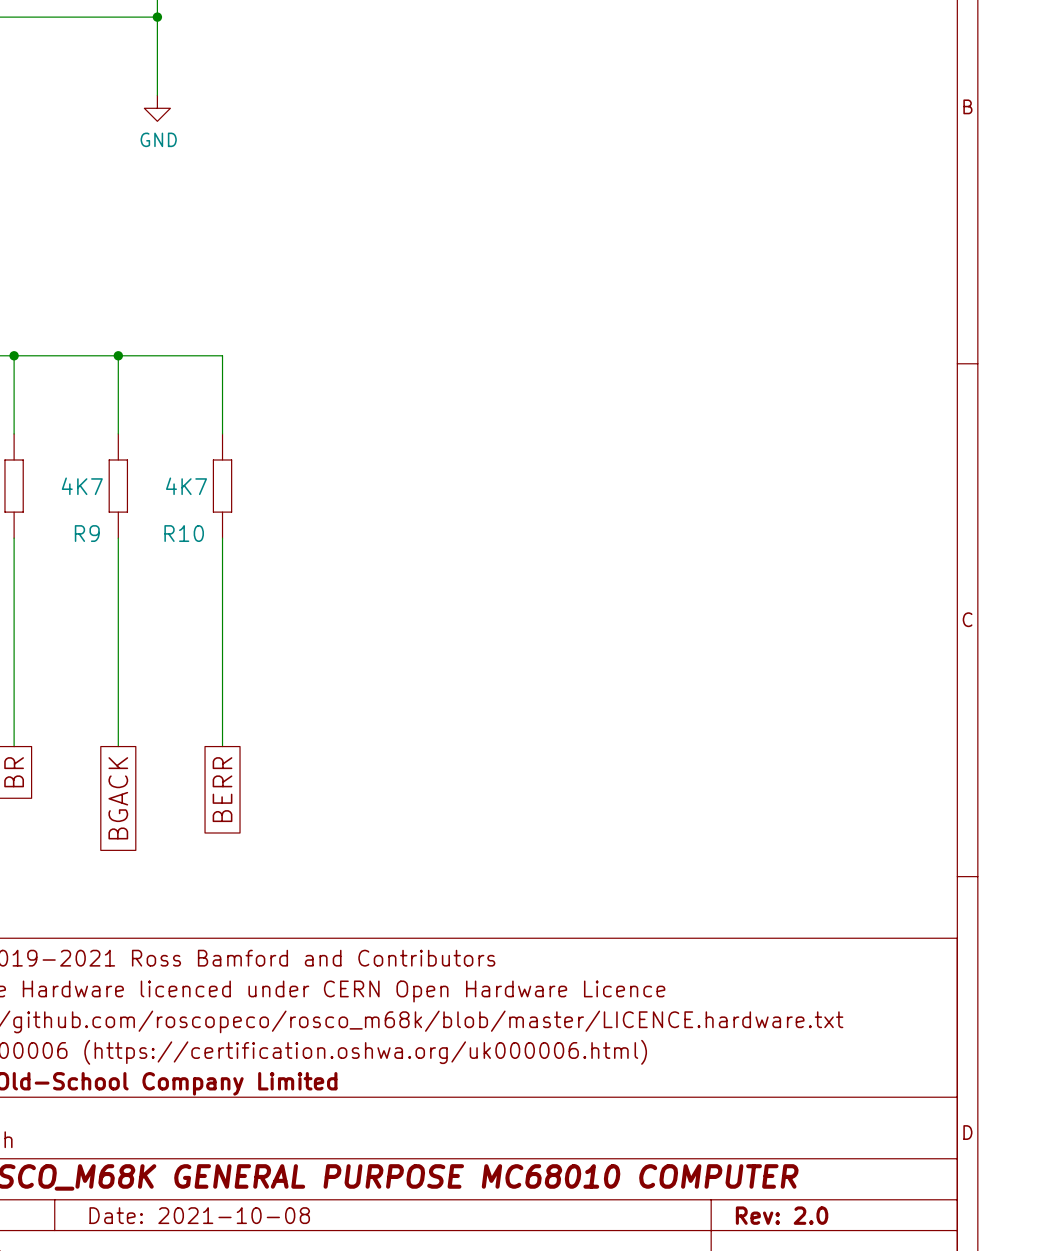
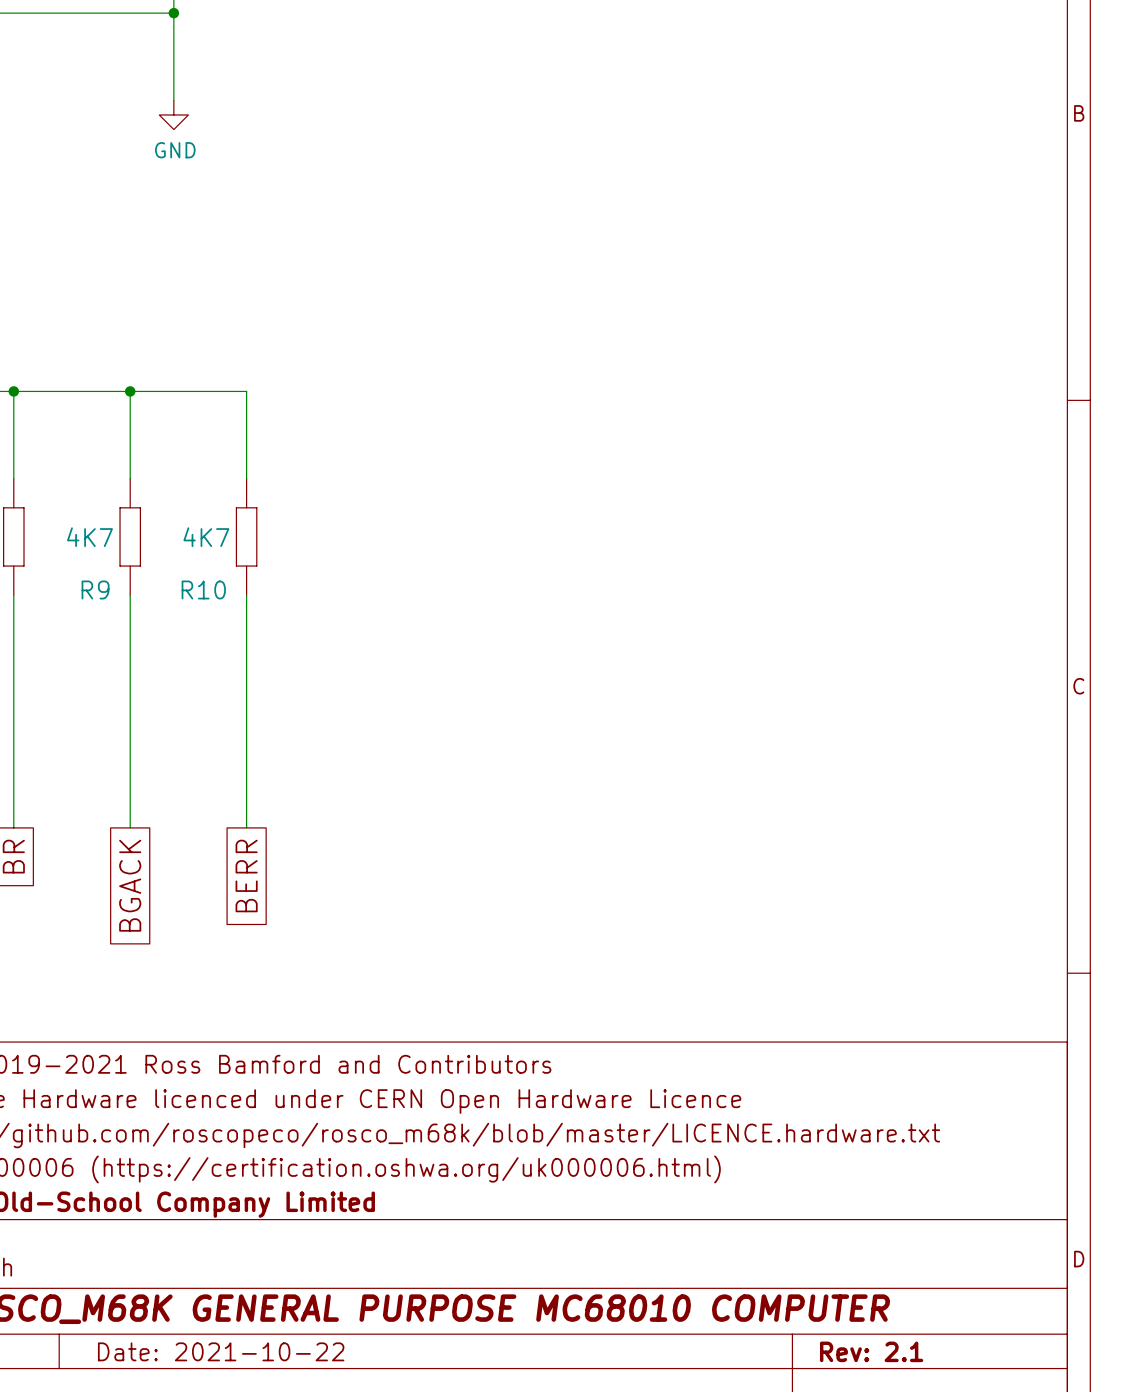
title block: Date: 2021-10-08 (199, 1215) -> Date: 2021-10-22 (221, 1351)
title block: Rev: 2.0 (782, 1215) -> Rev: 2.1 (871, 1351)

